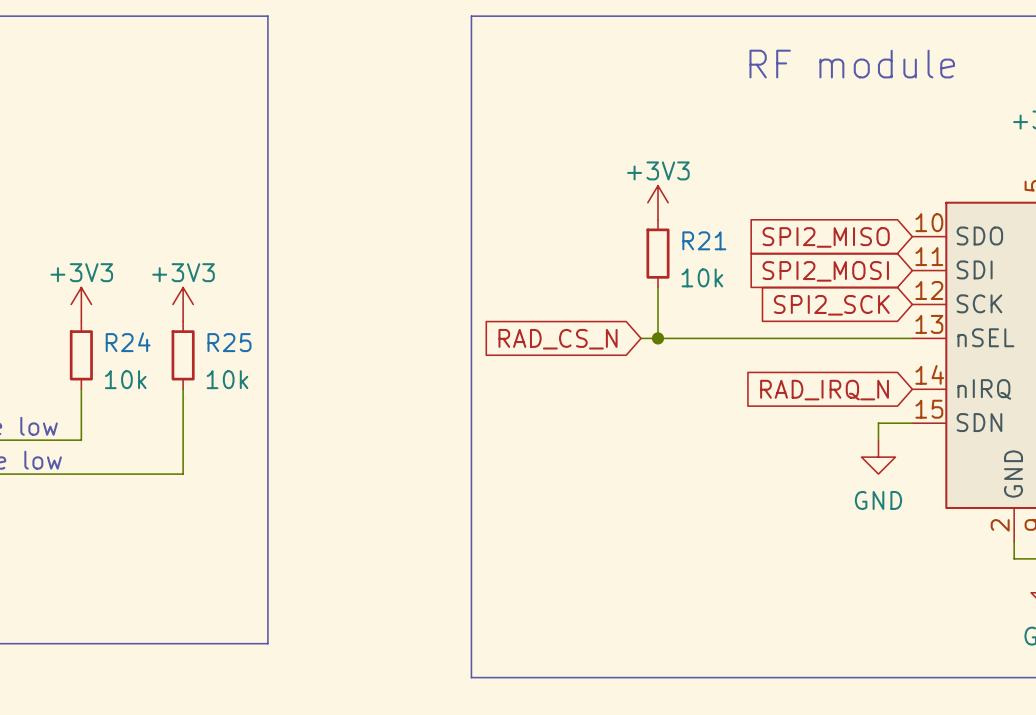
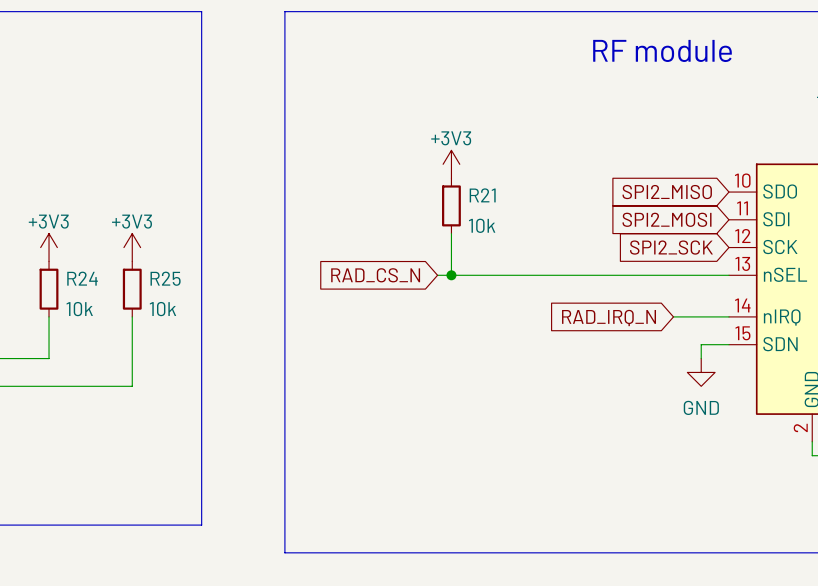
line: (471, 16) (471, 677) -> (368, 11) (284, 11) (284, 552) (368, 552)
power symbol position: +3V3 (657, 202) -> +3V3 (451, 164)
R21 position: (657, 253) -> (451, 205)
wire: (657, 287) (657, 338) -> (451, 233) (451, 275)
wire: none -> (437, 275) (506, 275)
junction: none -> (451, 275)
junction: (657, 338) -> none
global label position: RAD_CS_N (558, 339) -> RAD_CS_N (375, 275)
wire: none -> (673, 316) (728, 316)
global label position: RAD_IRQ_N (824, 390) -> RAD_IRQ_N (609, 317)

